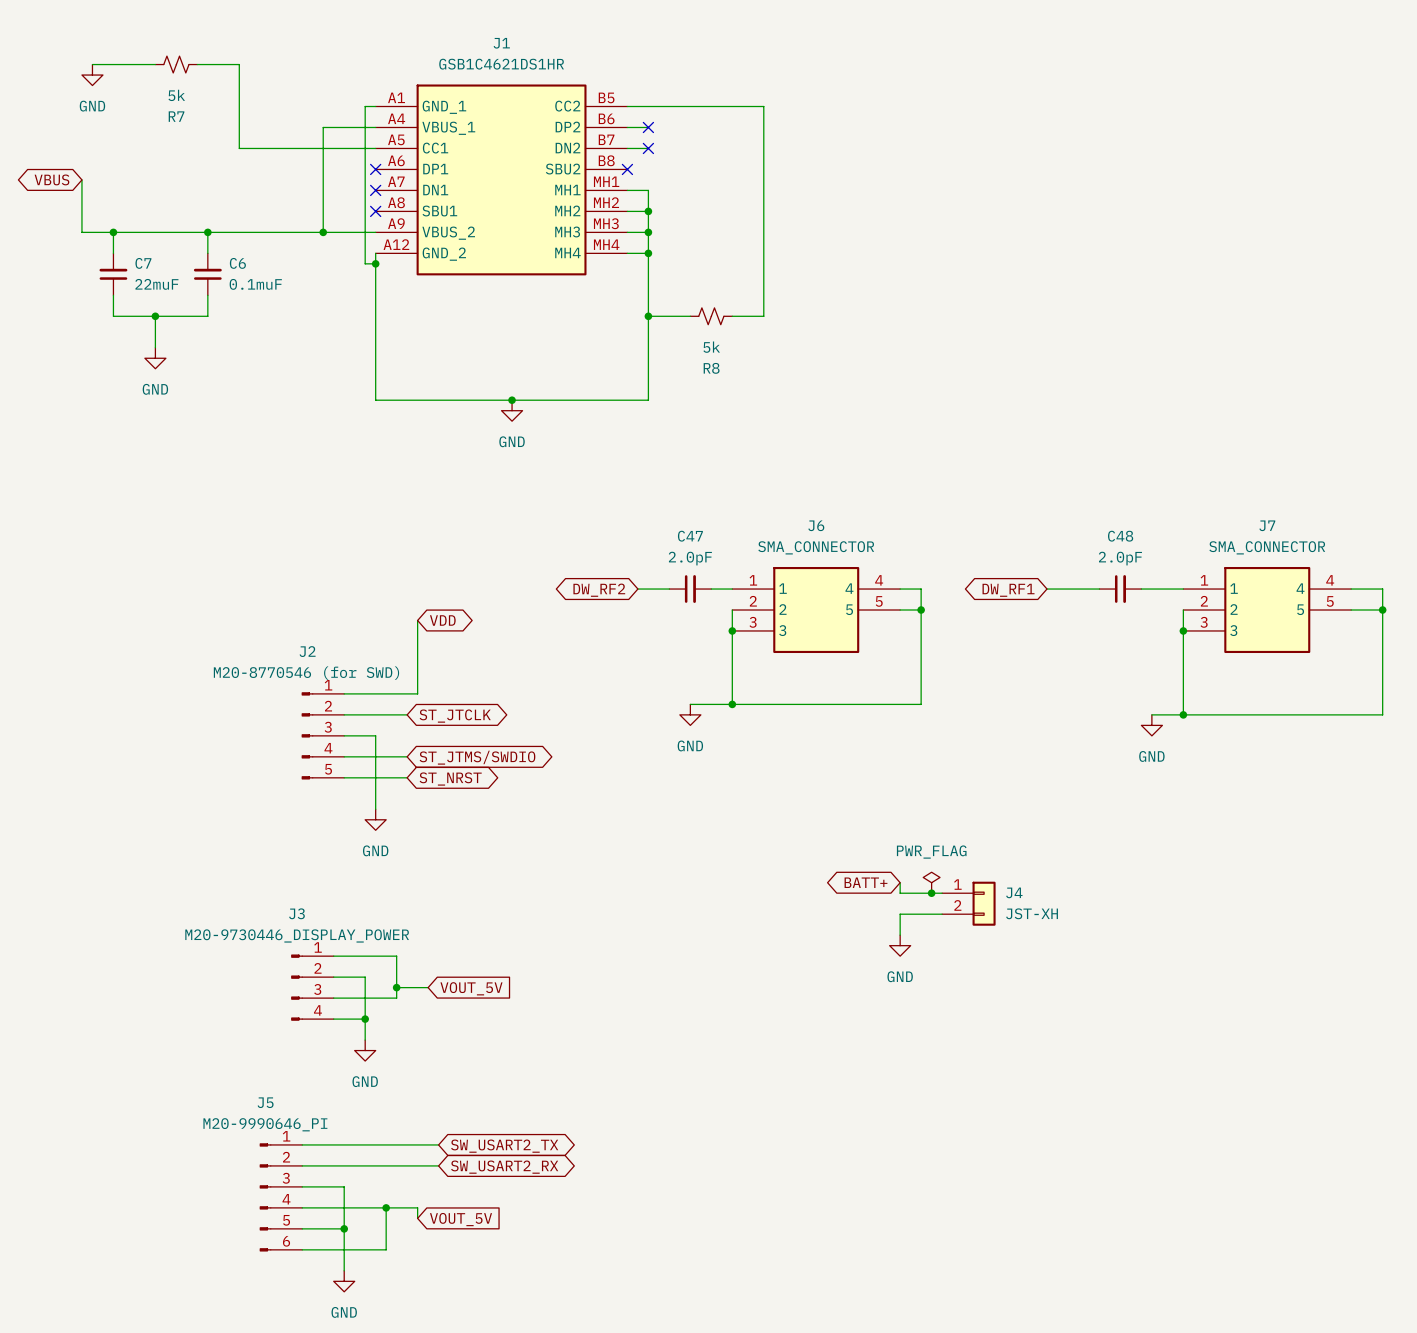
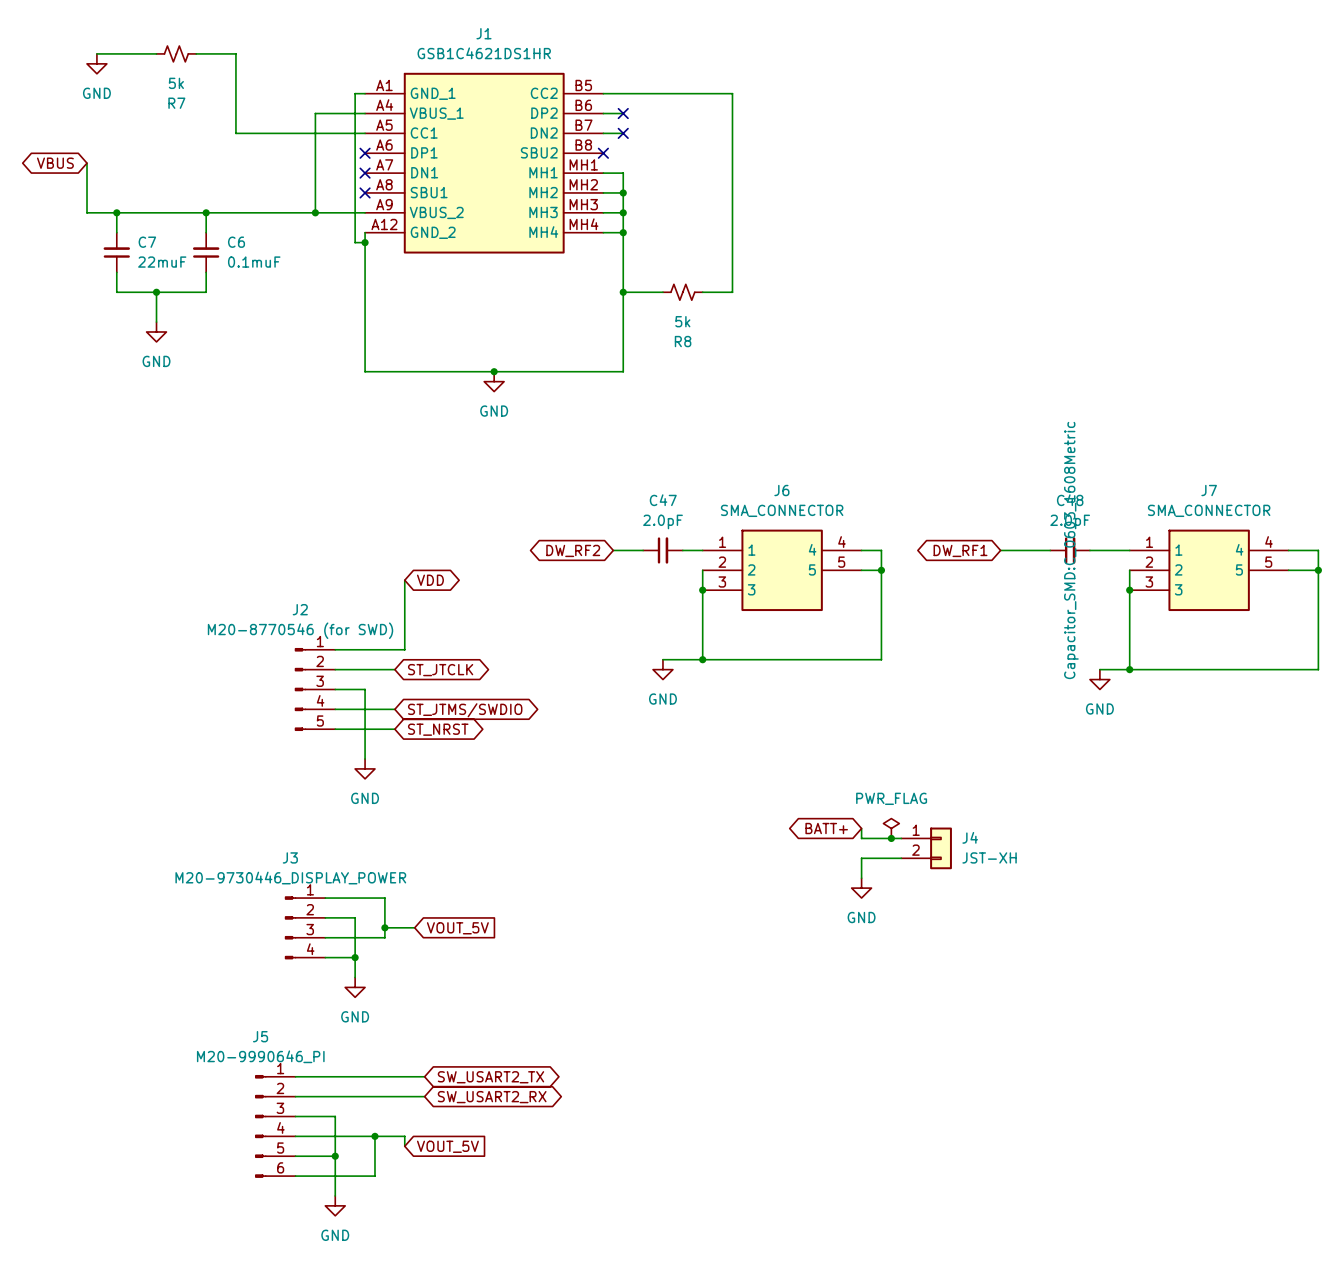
C48 text: none -> Capacitor_SMD:C_0603_1608Metric (1071, 550)

